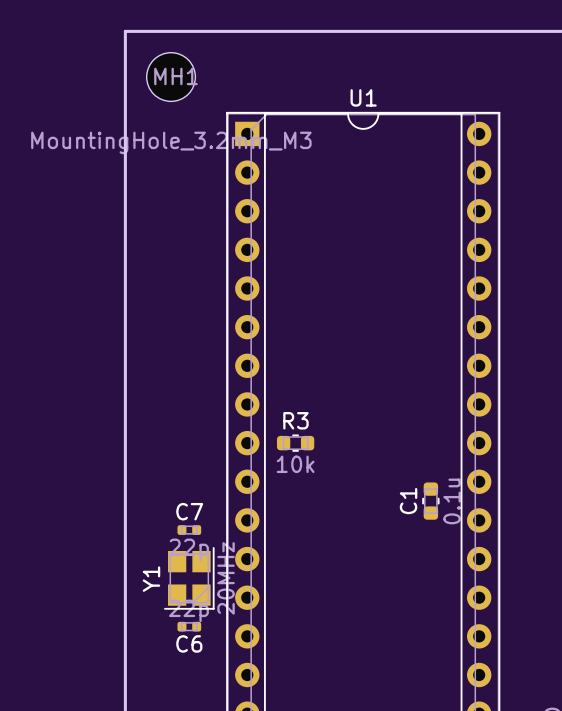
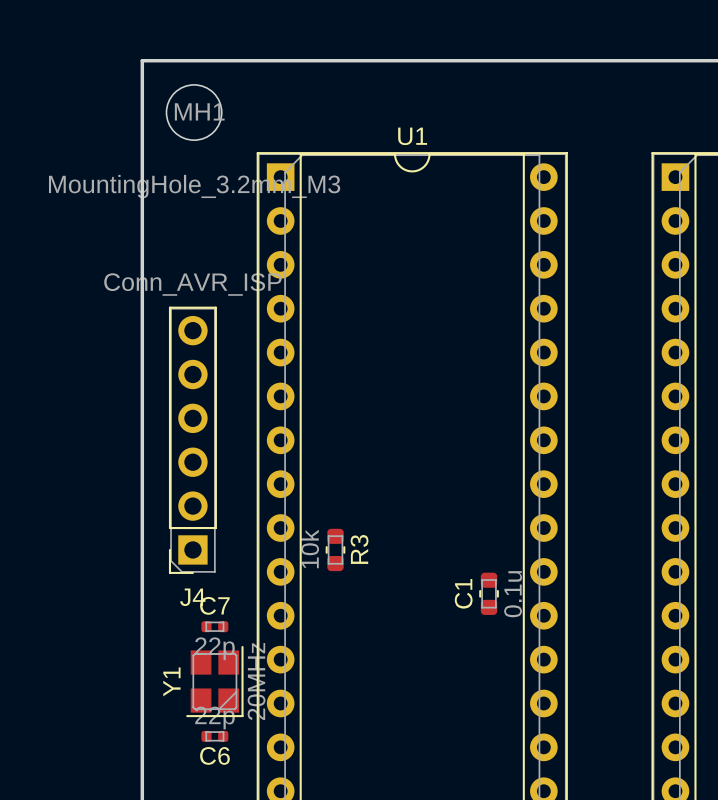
J4: none -> Conn_AVR_ISP (192, 440)
R3 rotation: 0° (295, 443) -> 90° clockwise (335, 549)

